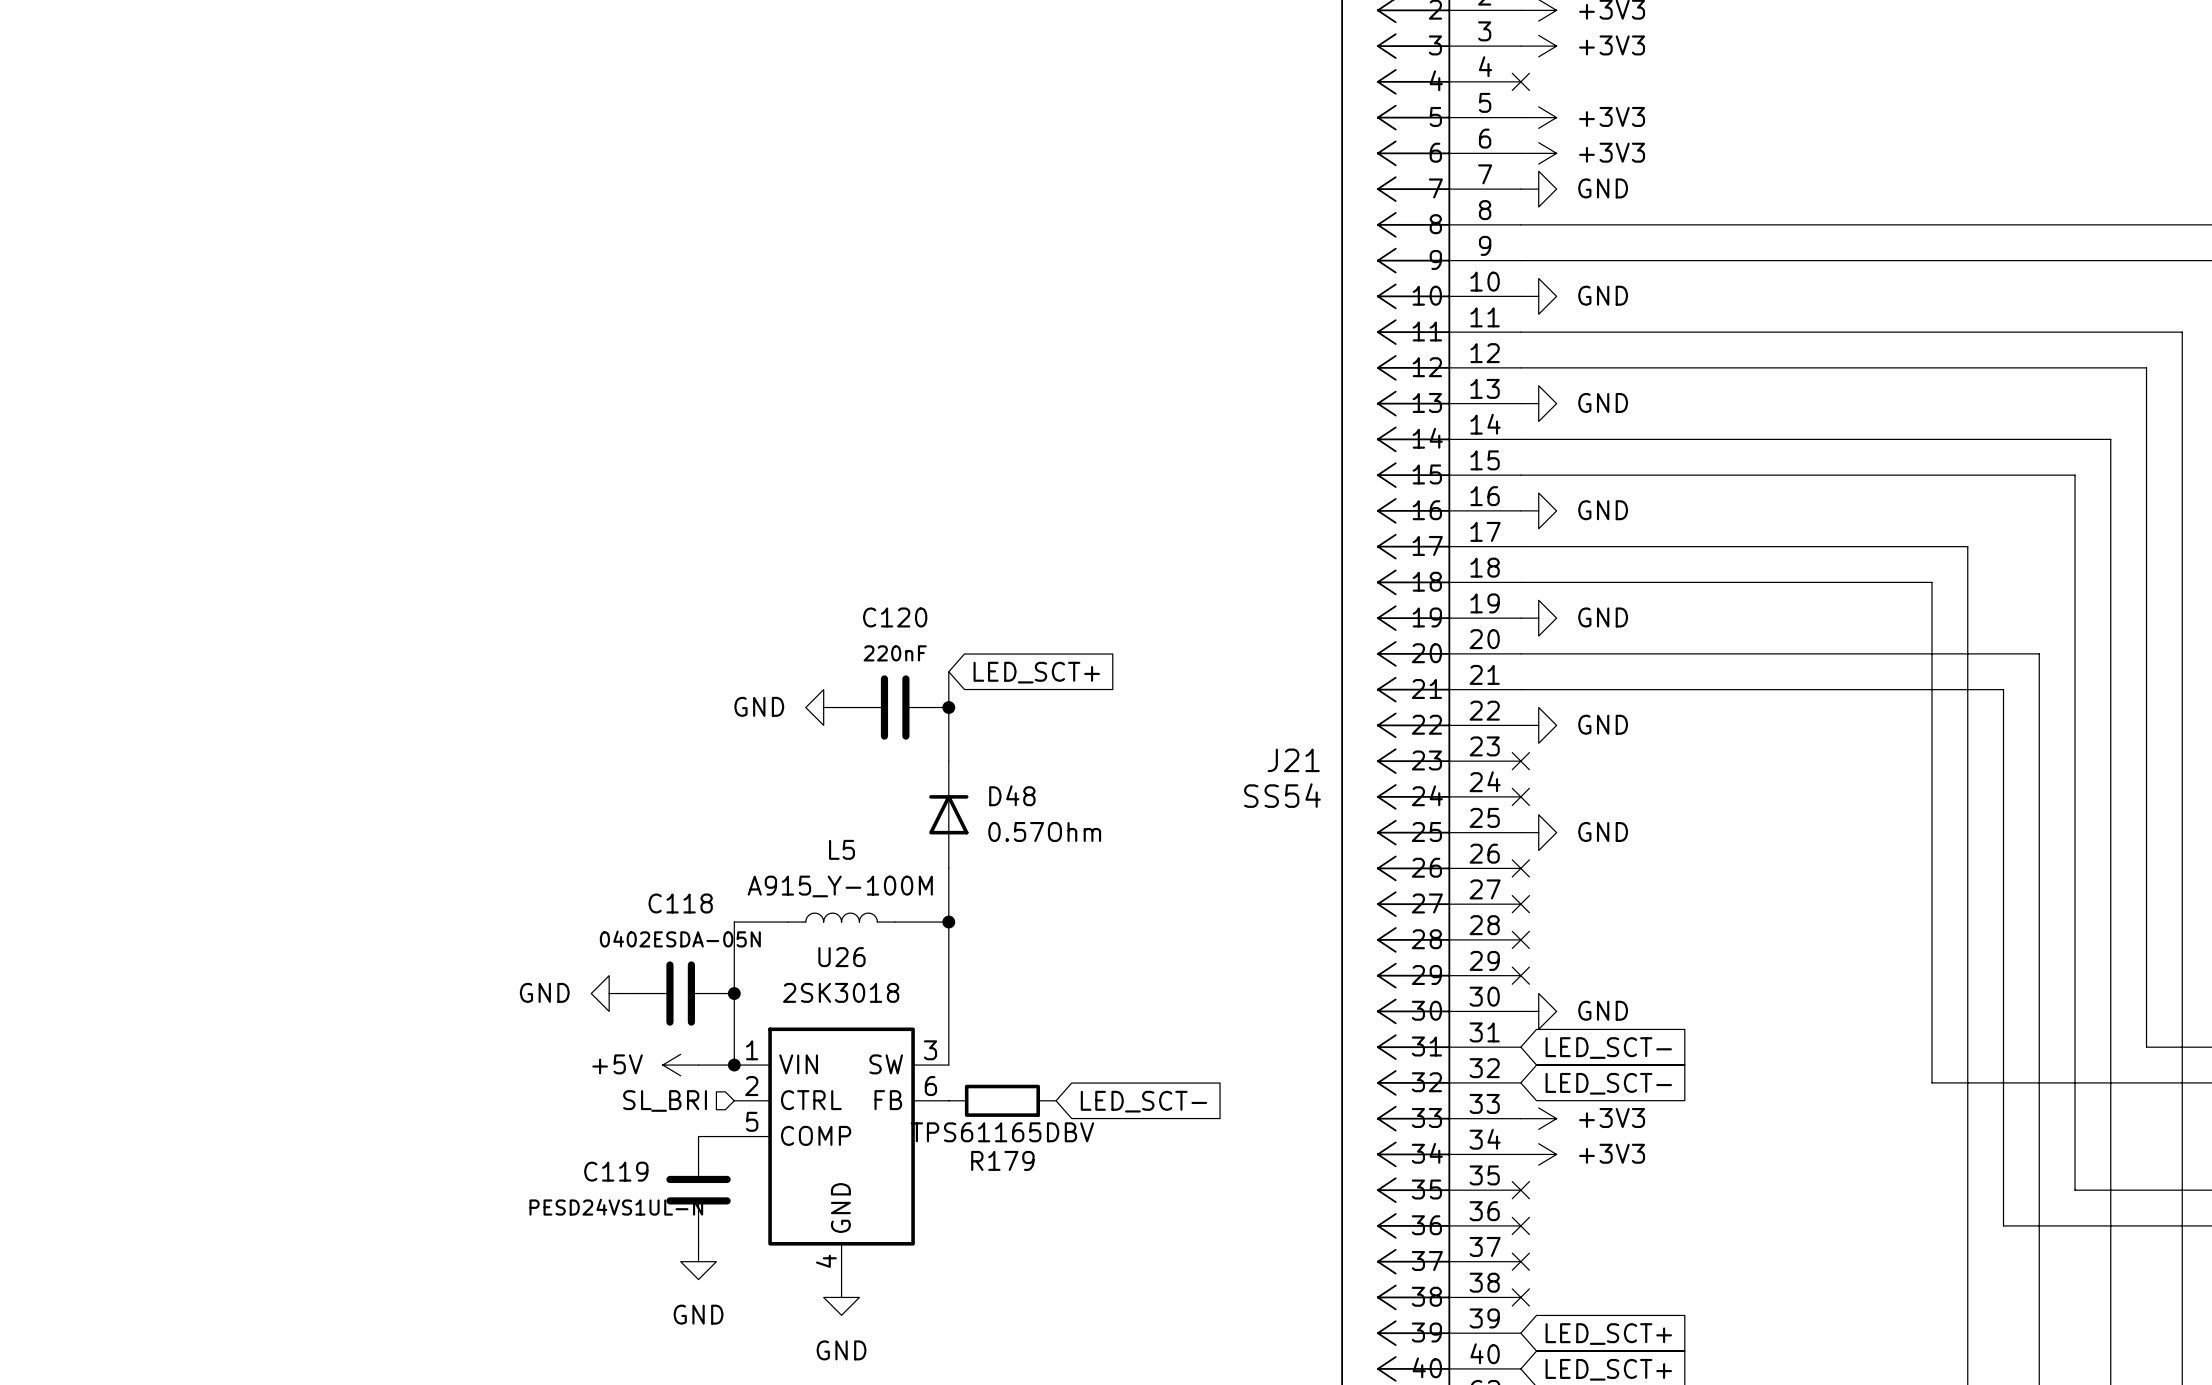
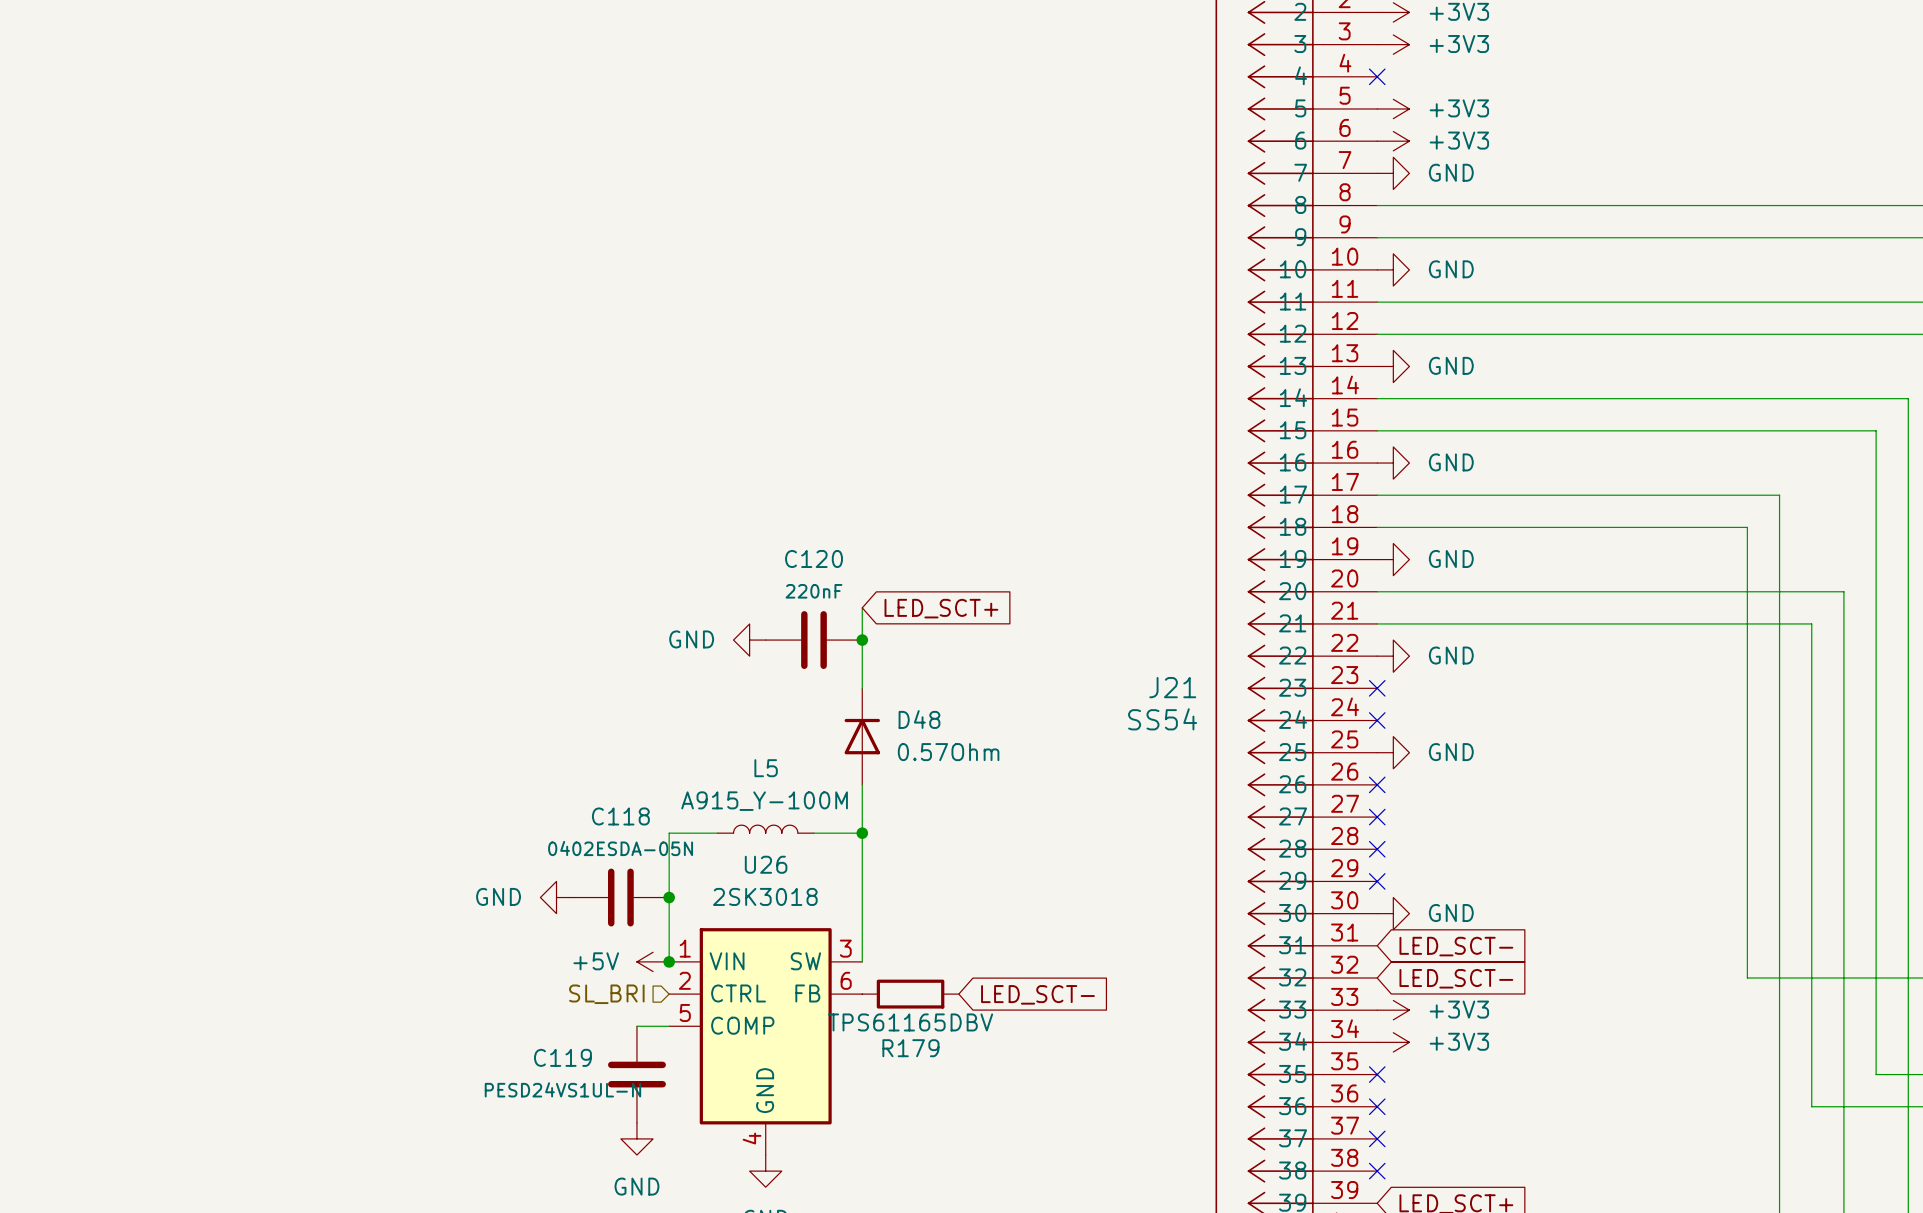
power symbol position: +5V (680, 1065) -> +5V (653, 961)

